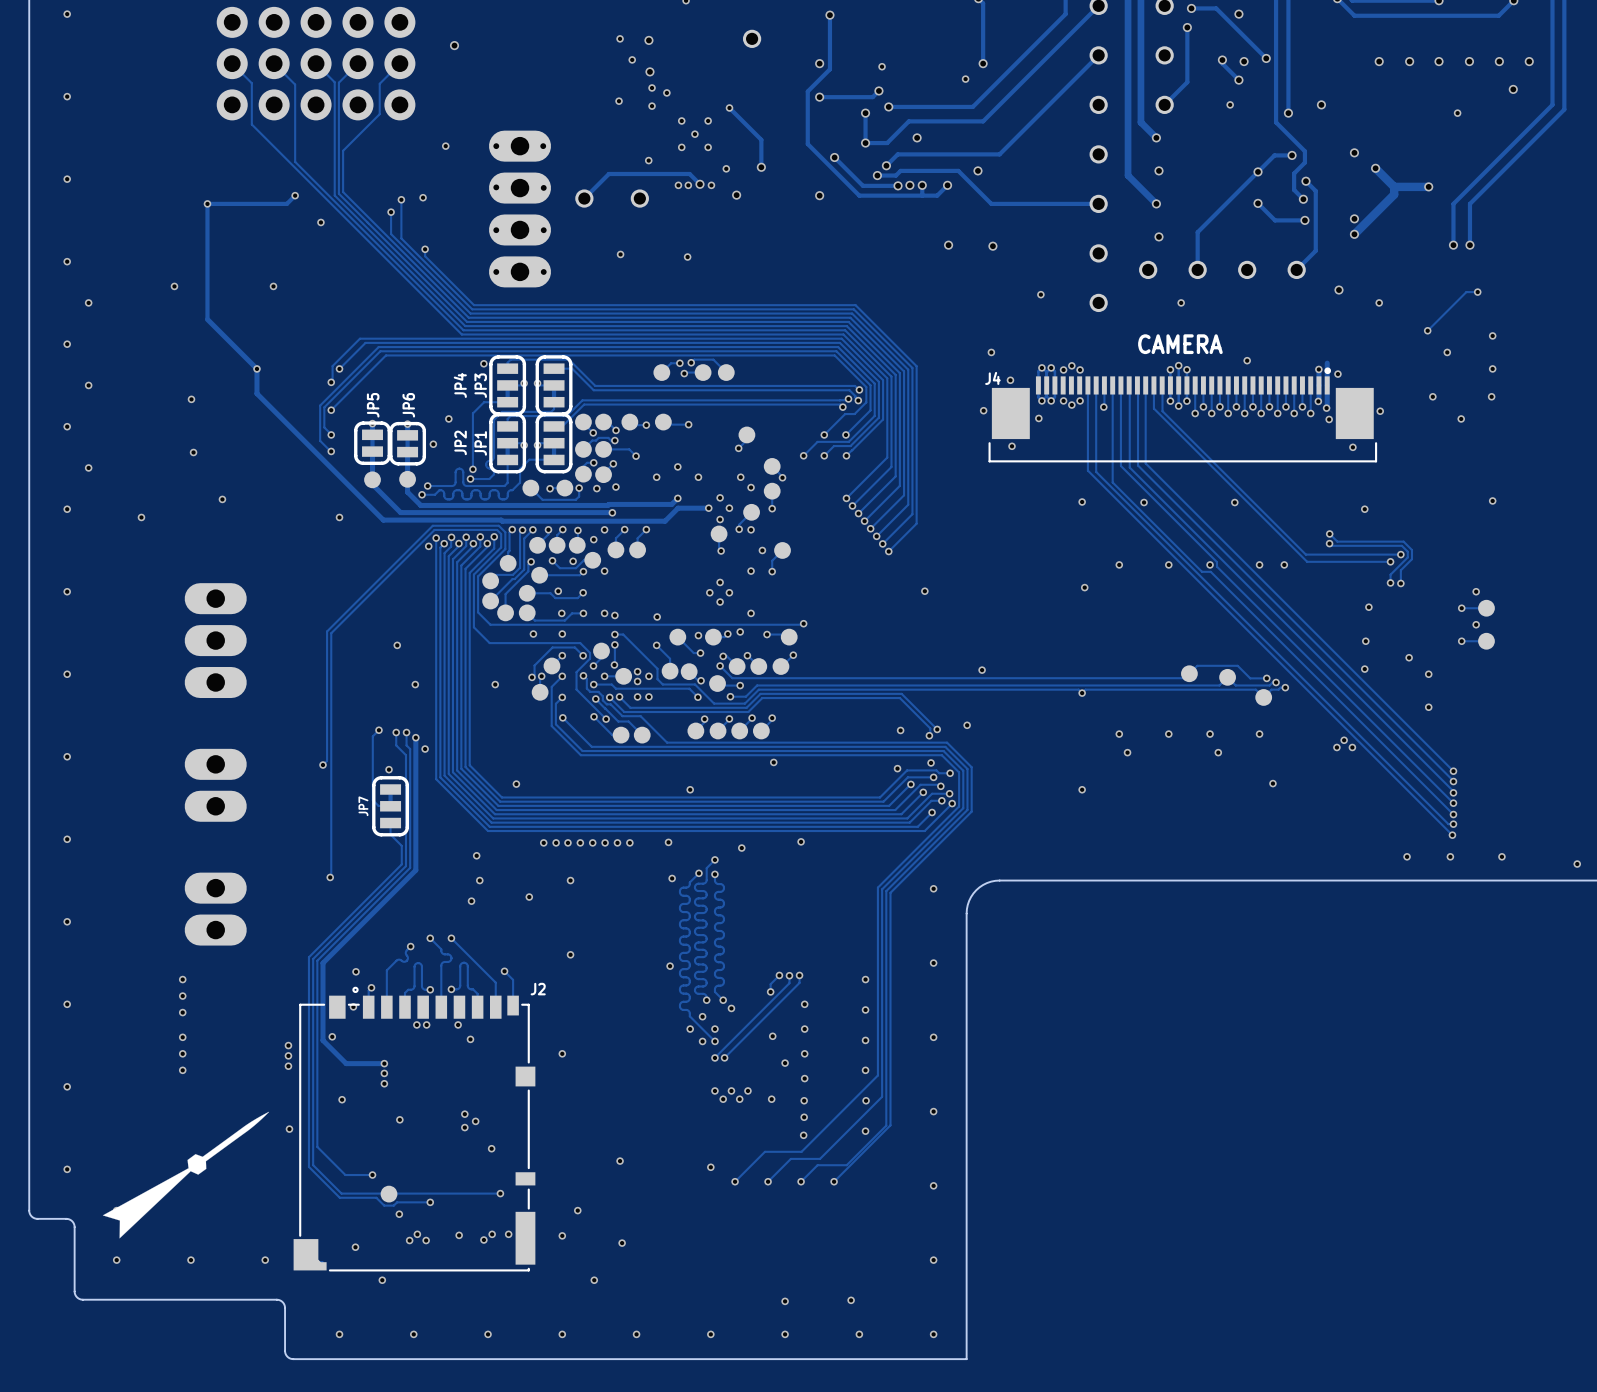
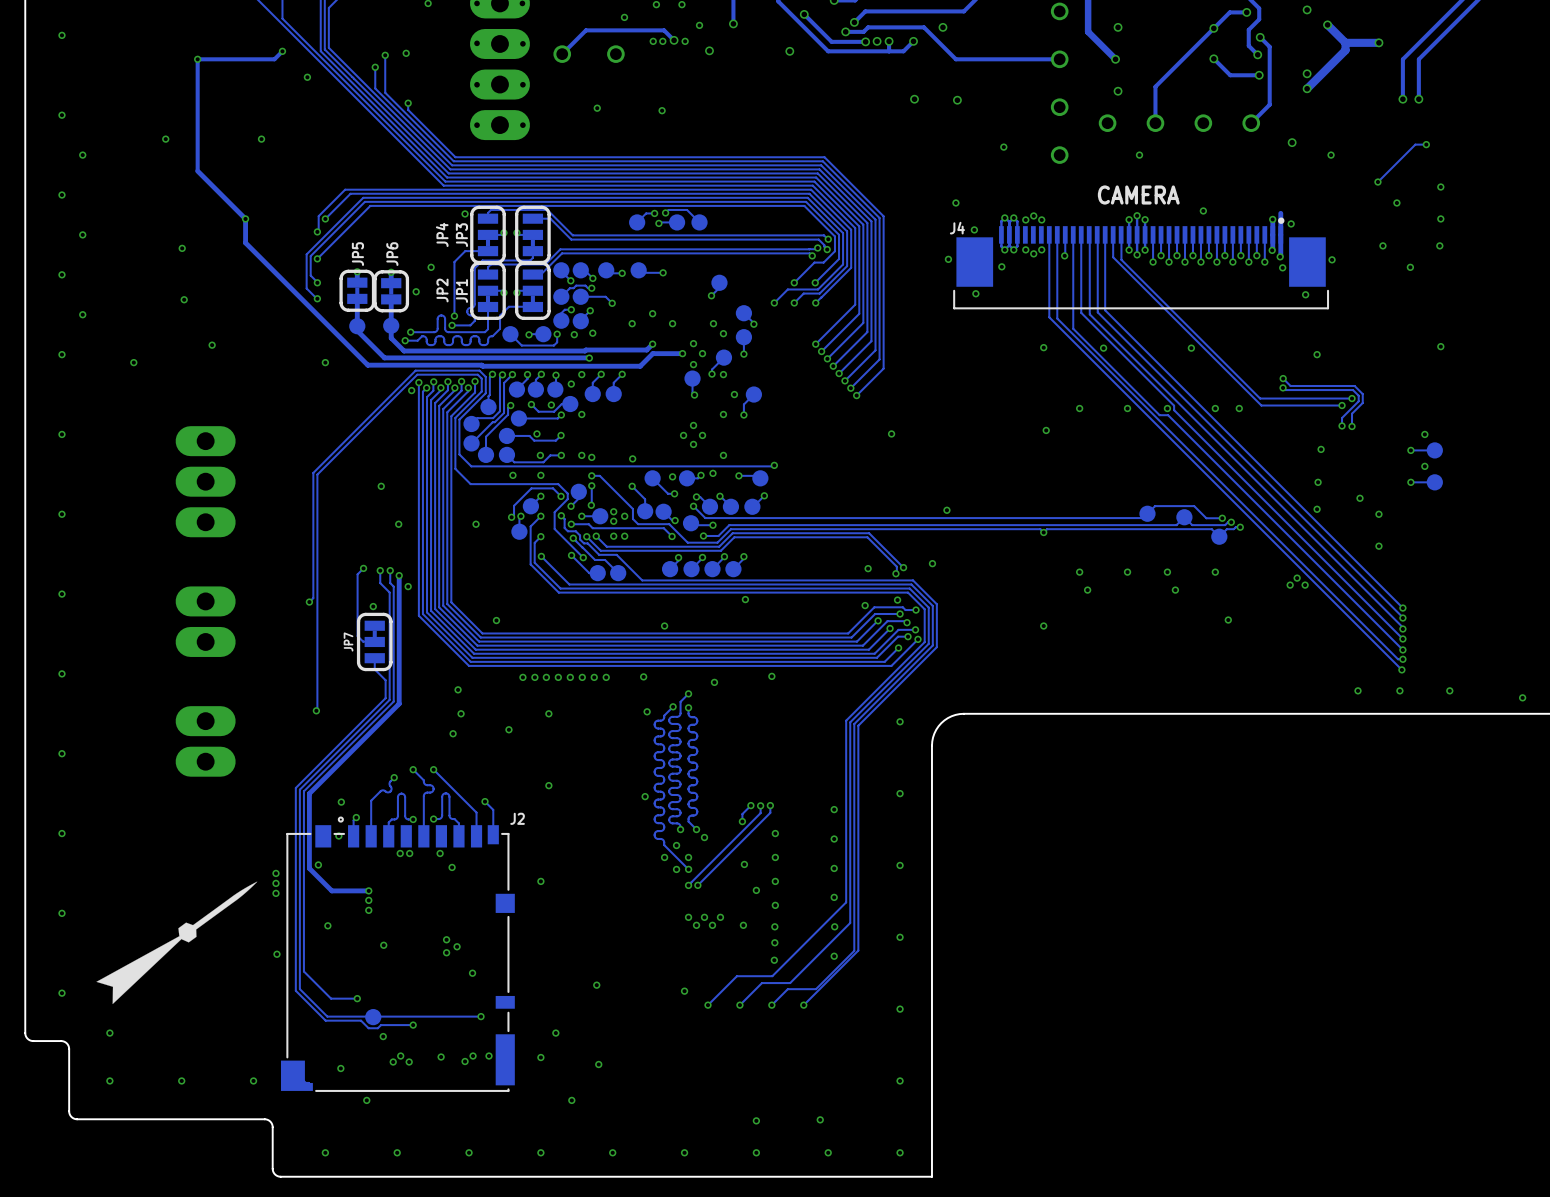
via: (182, 979) -> none
via: (182, 996) -> none
via: (182, 1012) -> none
via: (182, 1037) -> none
via: (182, 1053) -> none
via: (182, 1070) -> none
drawing position: (185, 1175) -> (176, 942)

